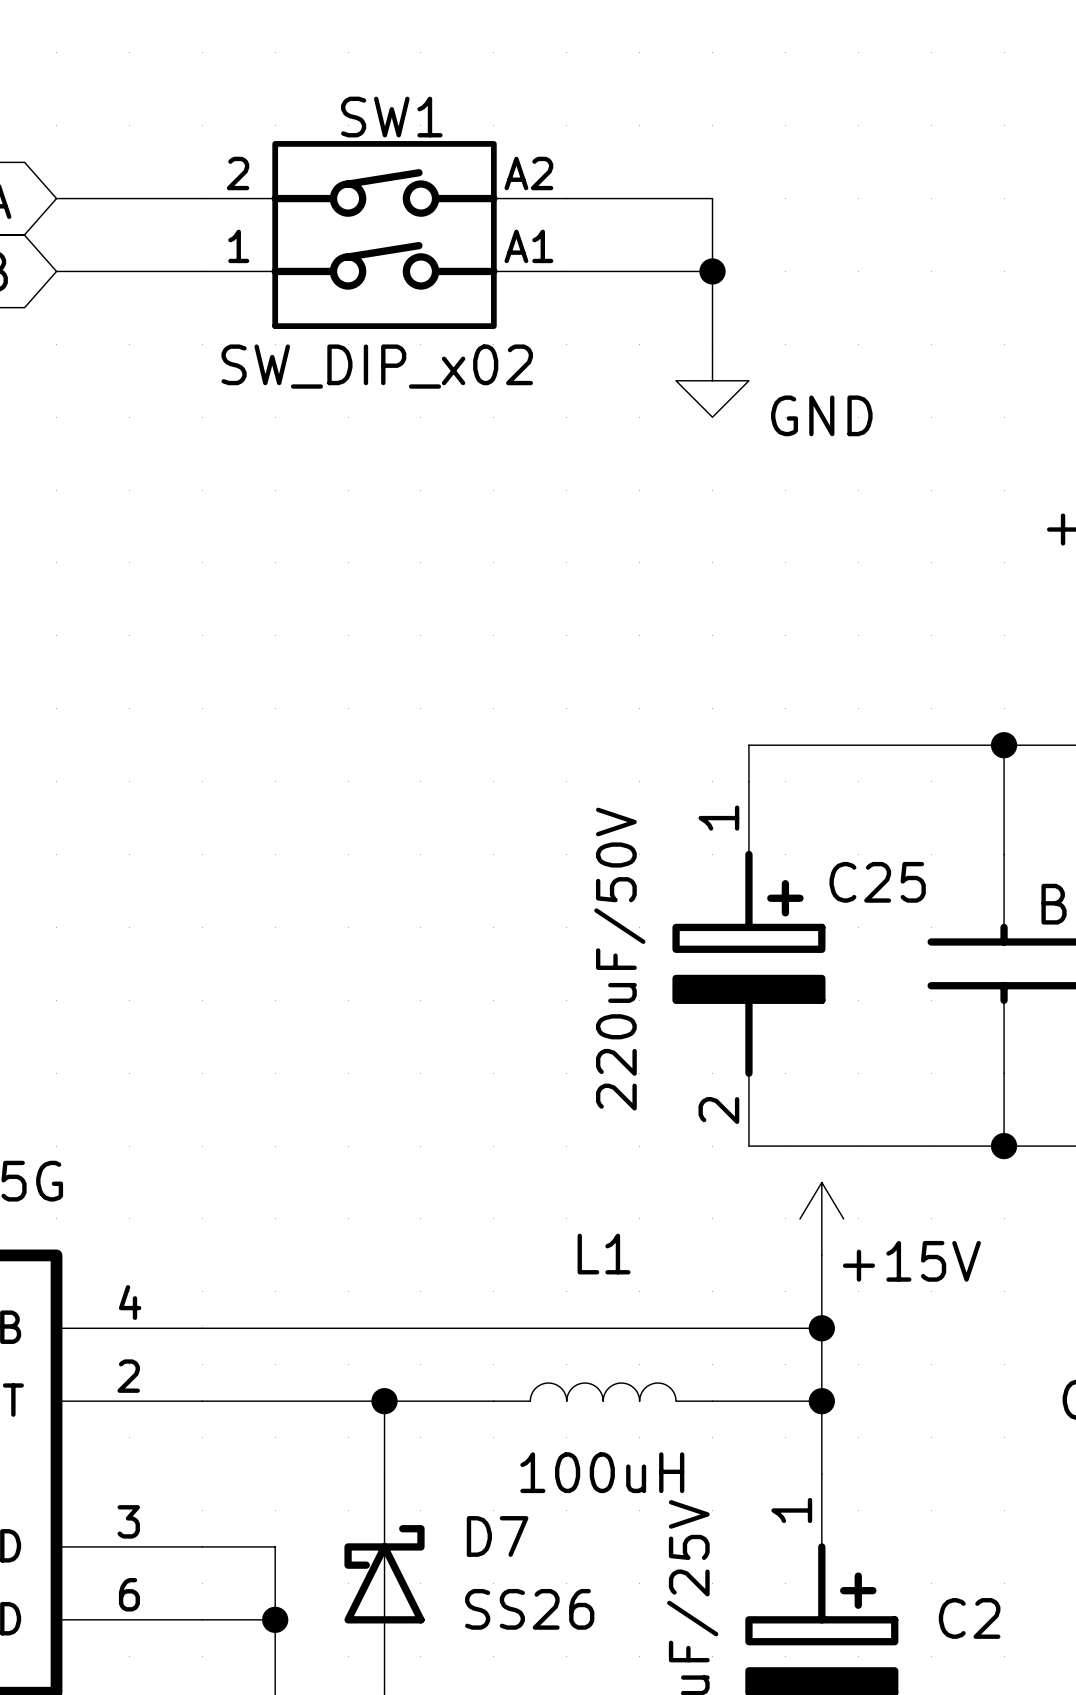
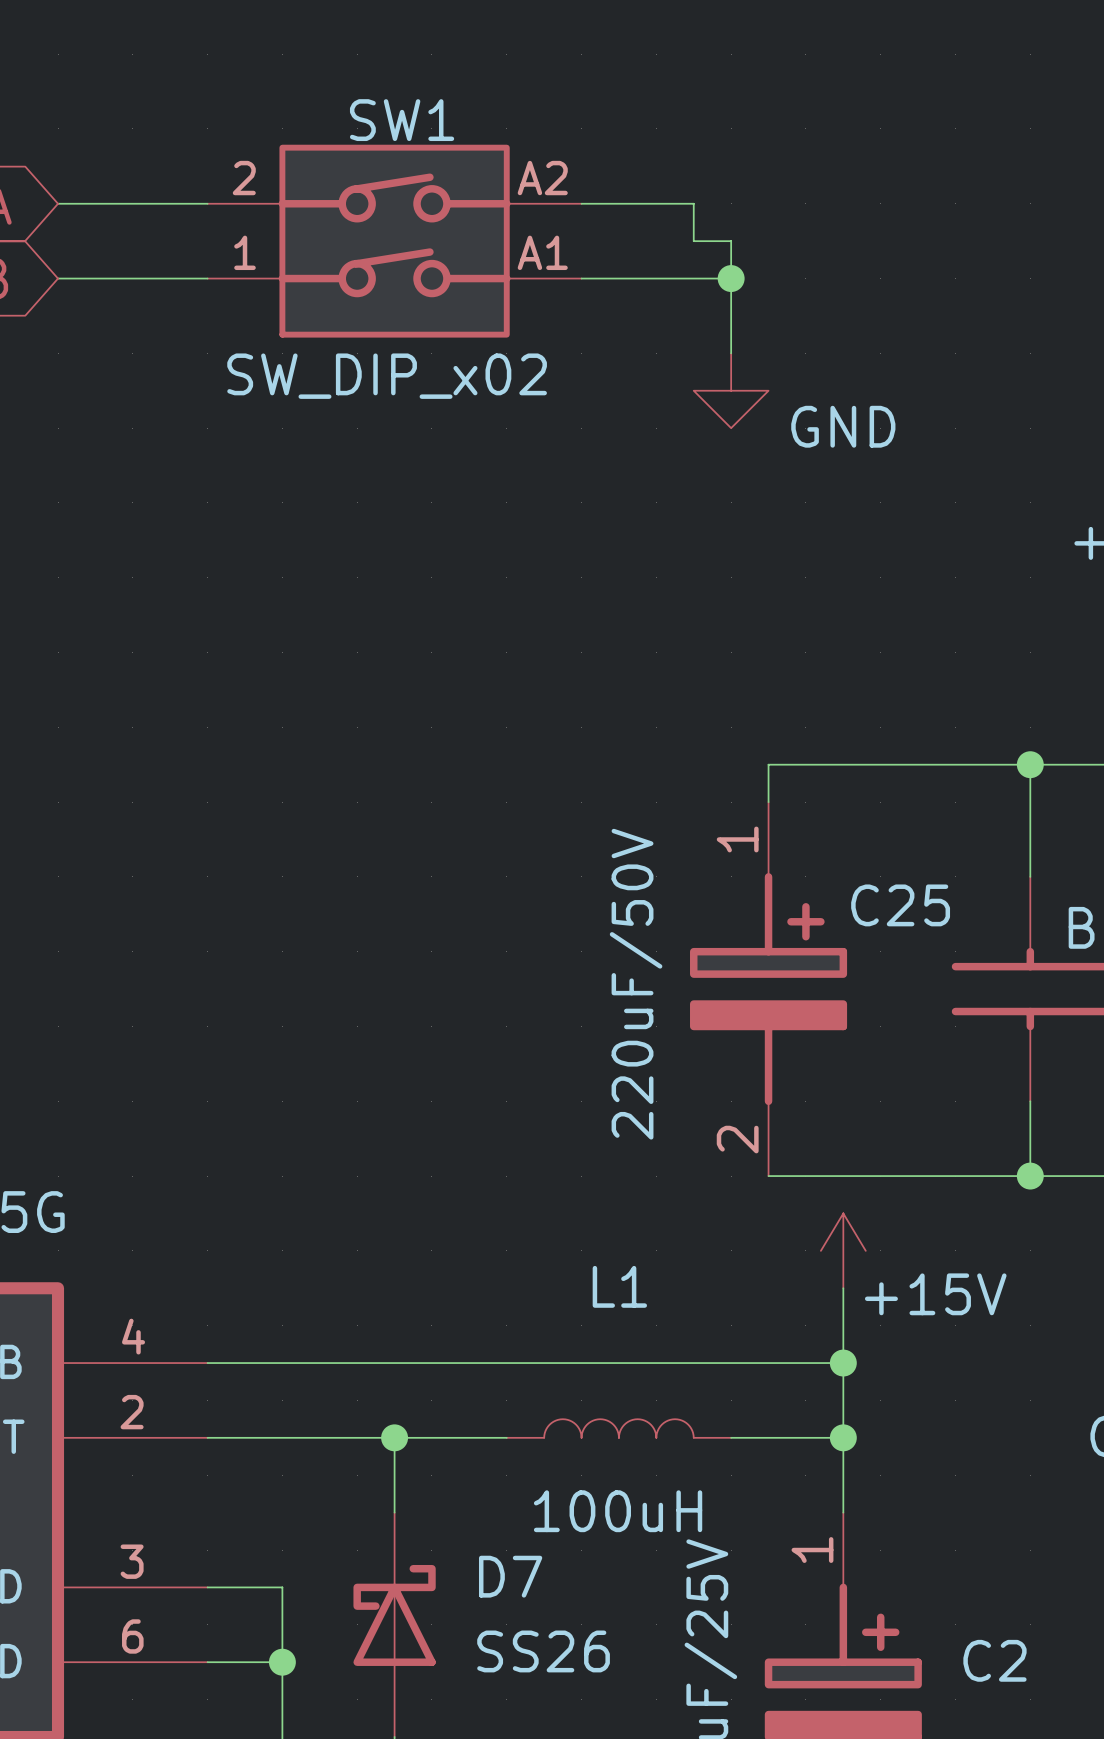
wire: (676, 198) (712, 198) (712, 235) -> (693, 203) (693, 241) (731, 241)

